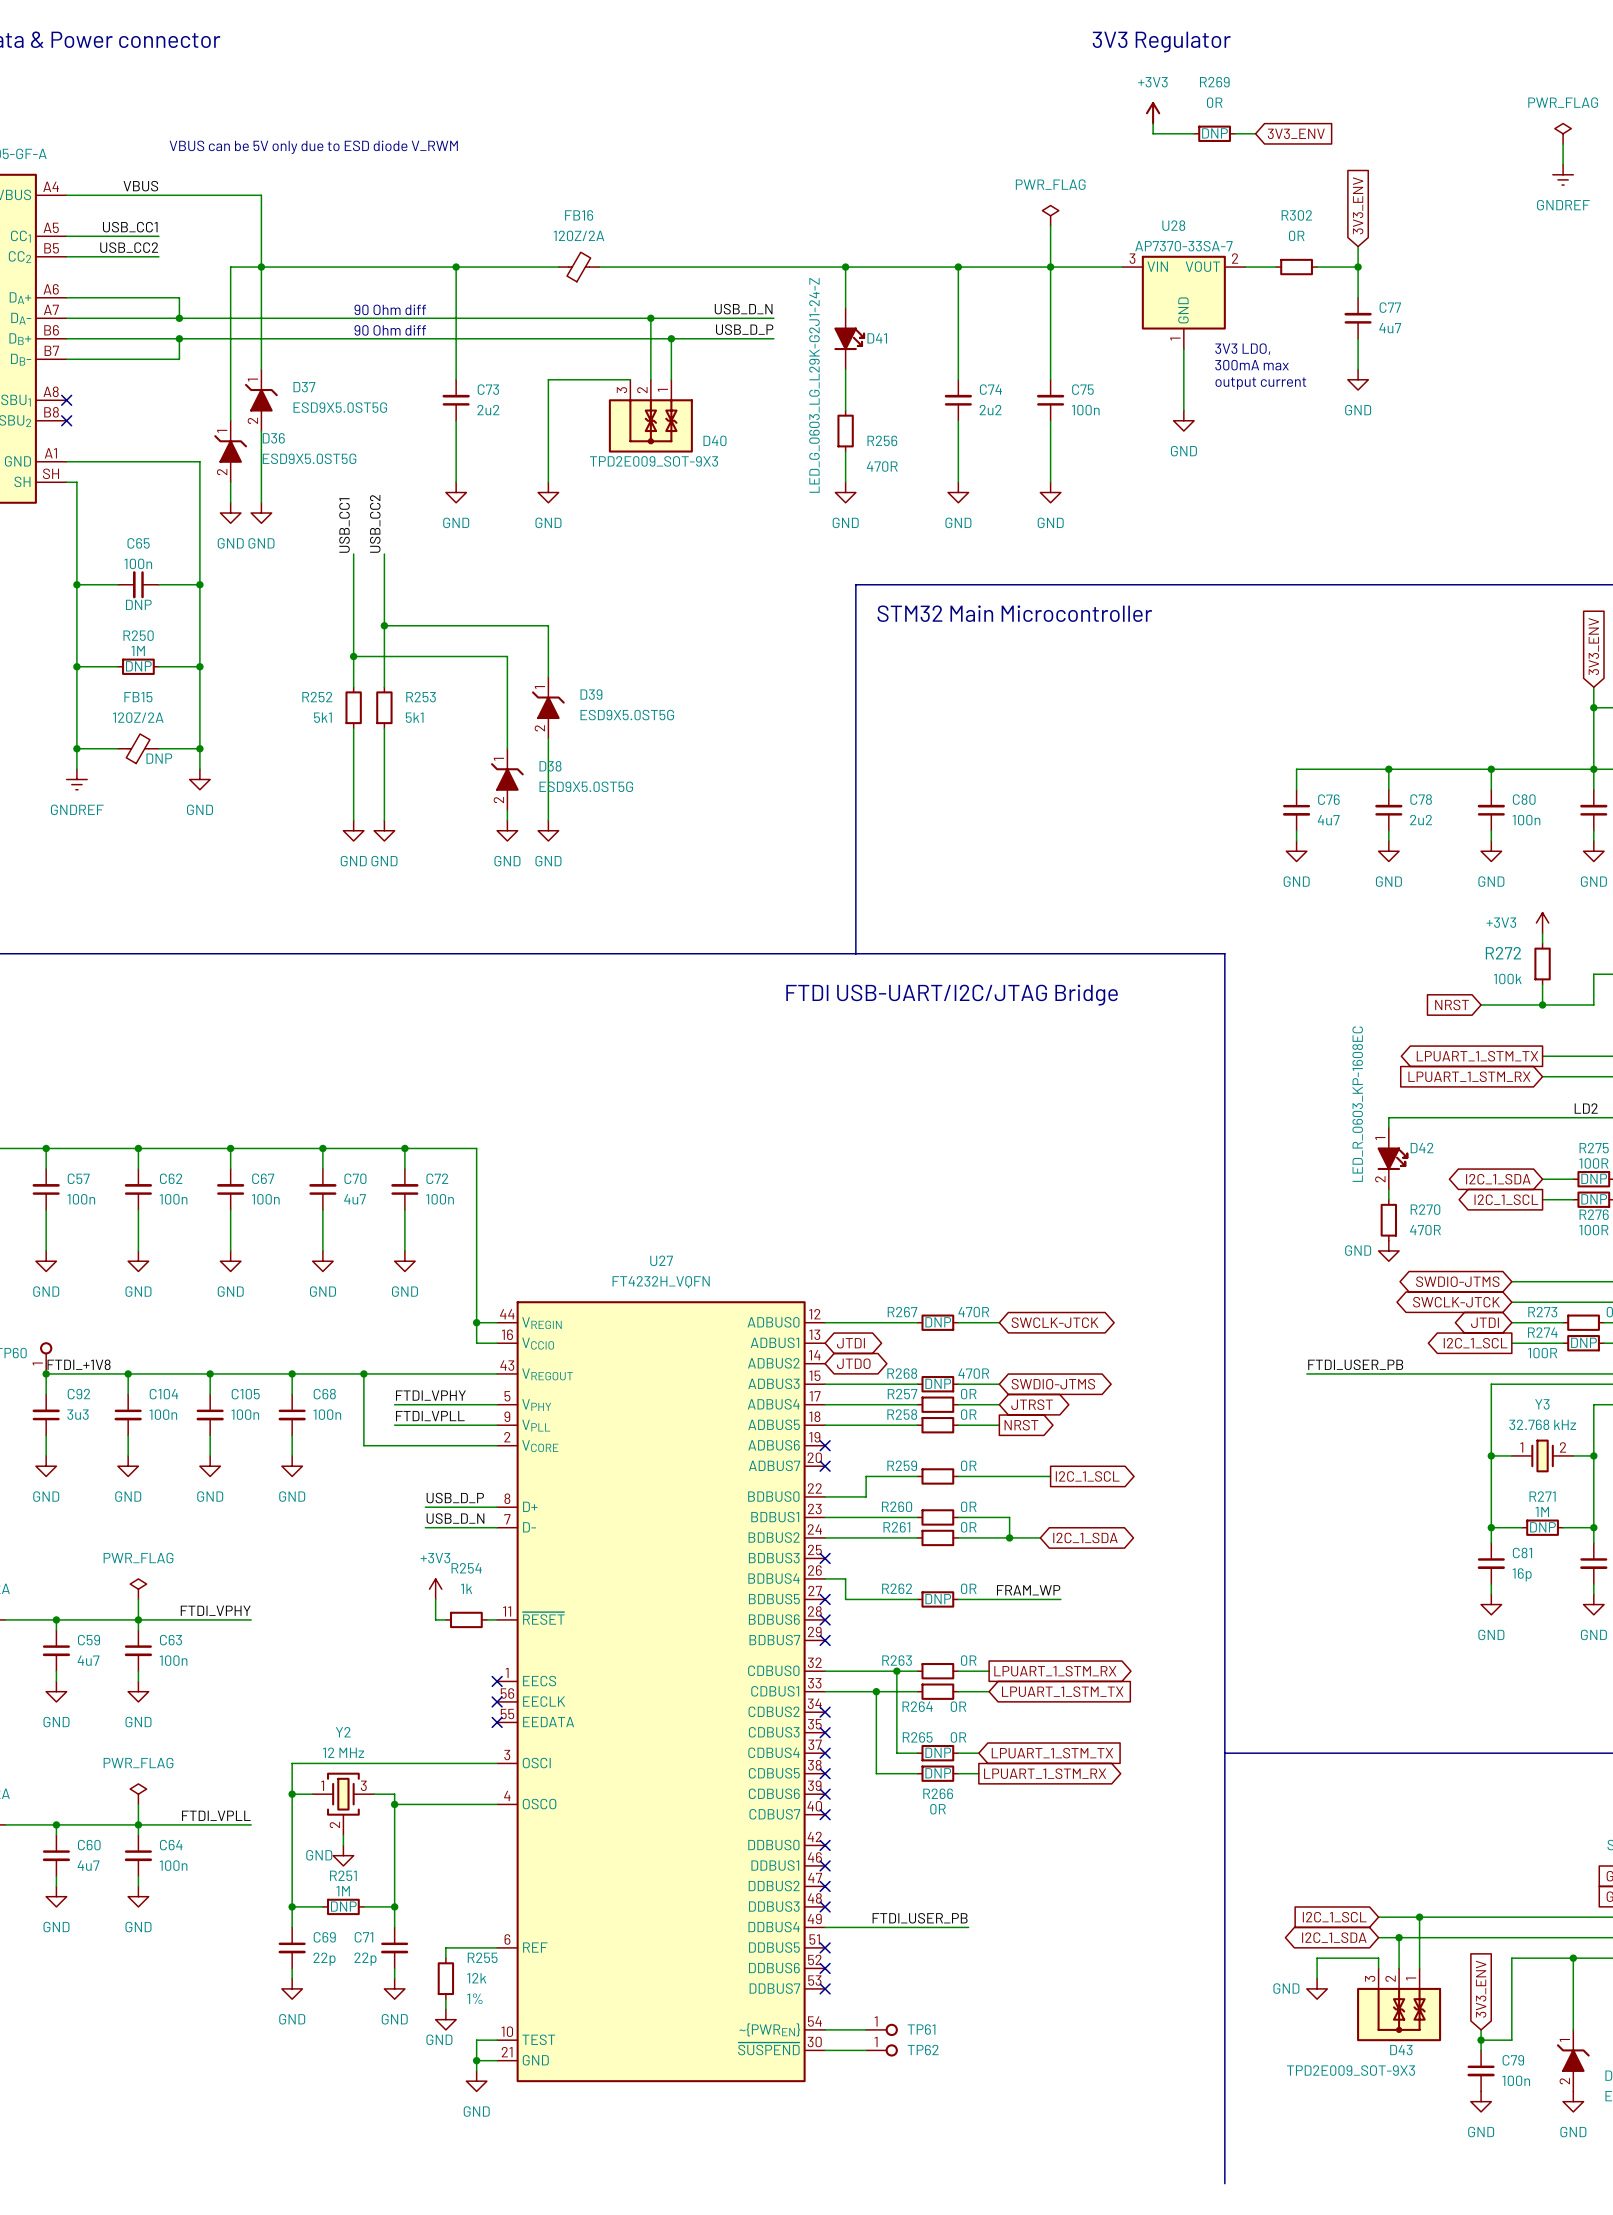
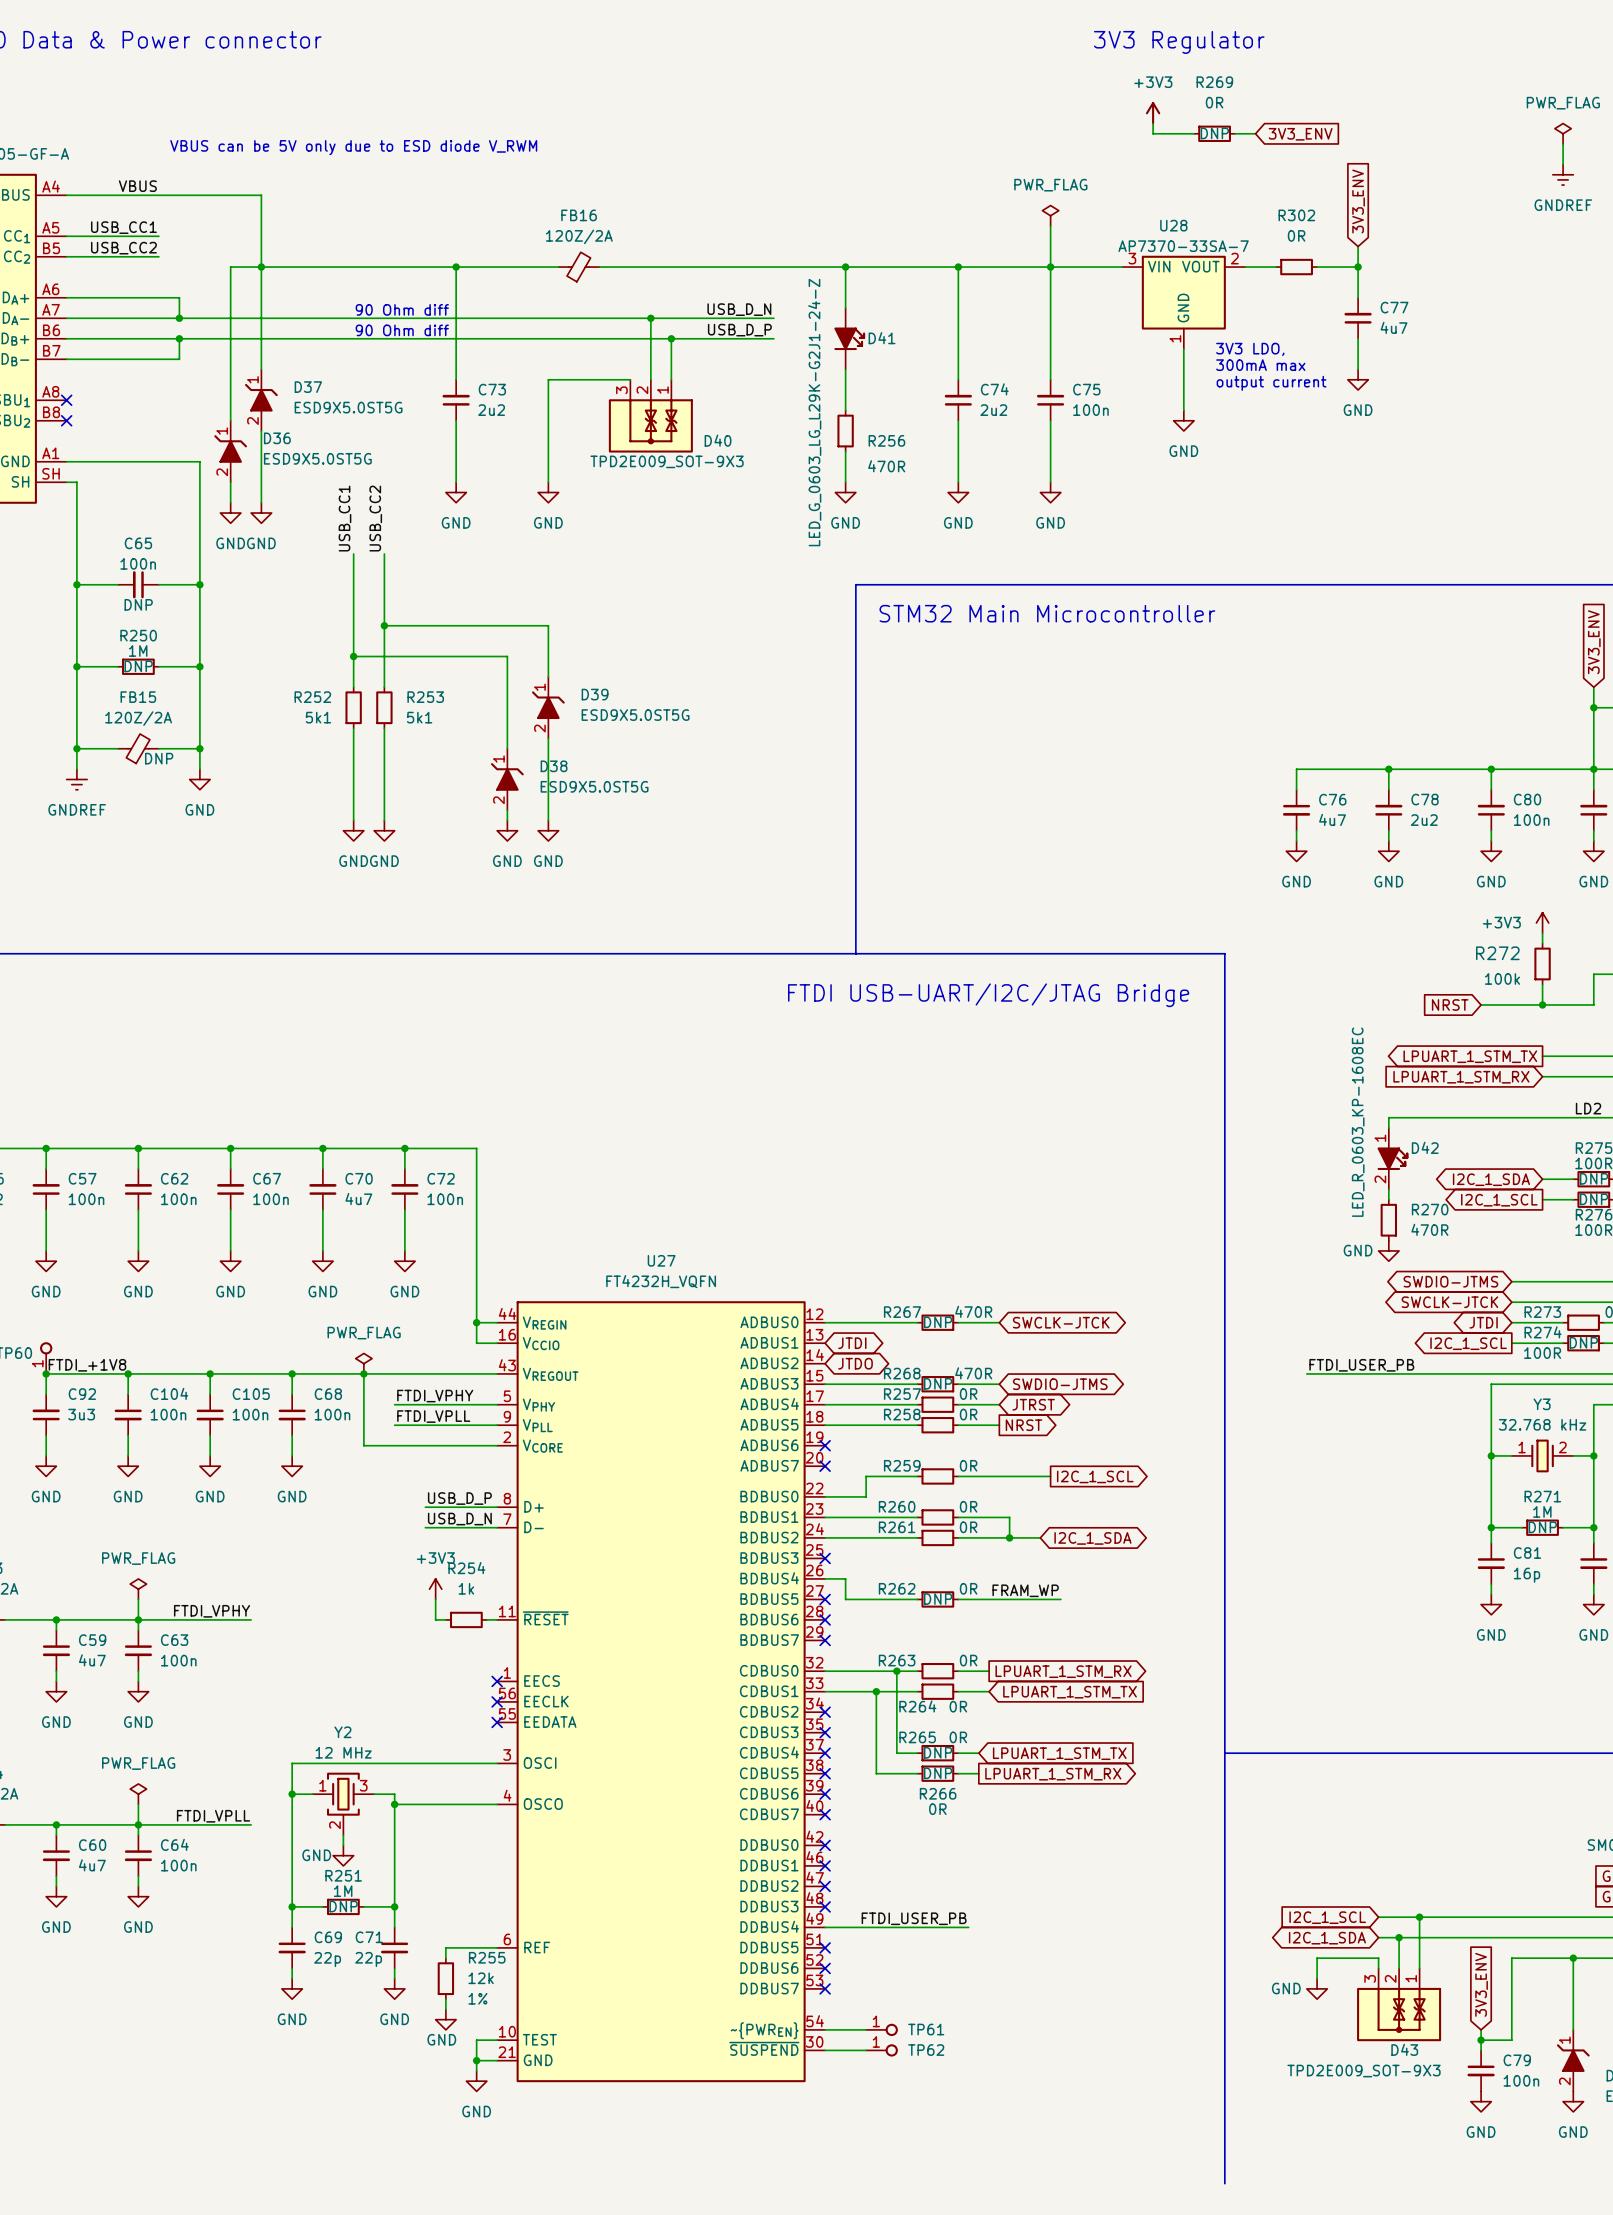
power symbol: none -> PWR_FLAG (363, 1363)

